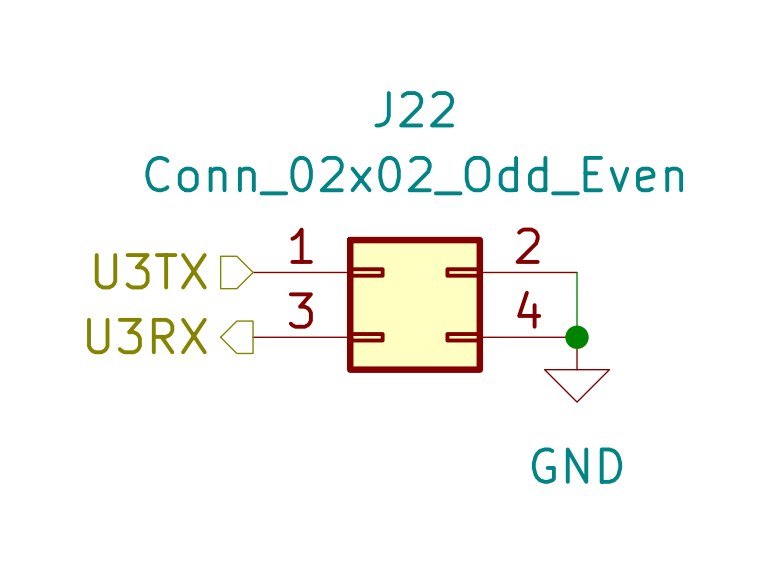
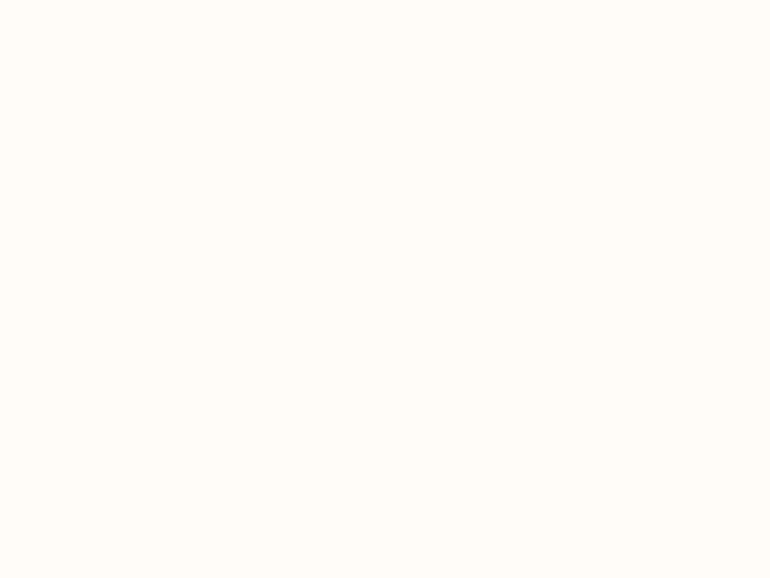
hierarchical label: U3TX (150, 271) -> none
wire: (577, 272) (577, 337) -> none
J22: Conn_02x02_Odd_Even (415, 304) -> none
hierarchical label: U3RX (146, 336) -> none
junction: (577, 337) -> none
power symbol: GND (577, 369) -> none

